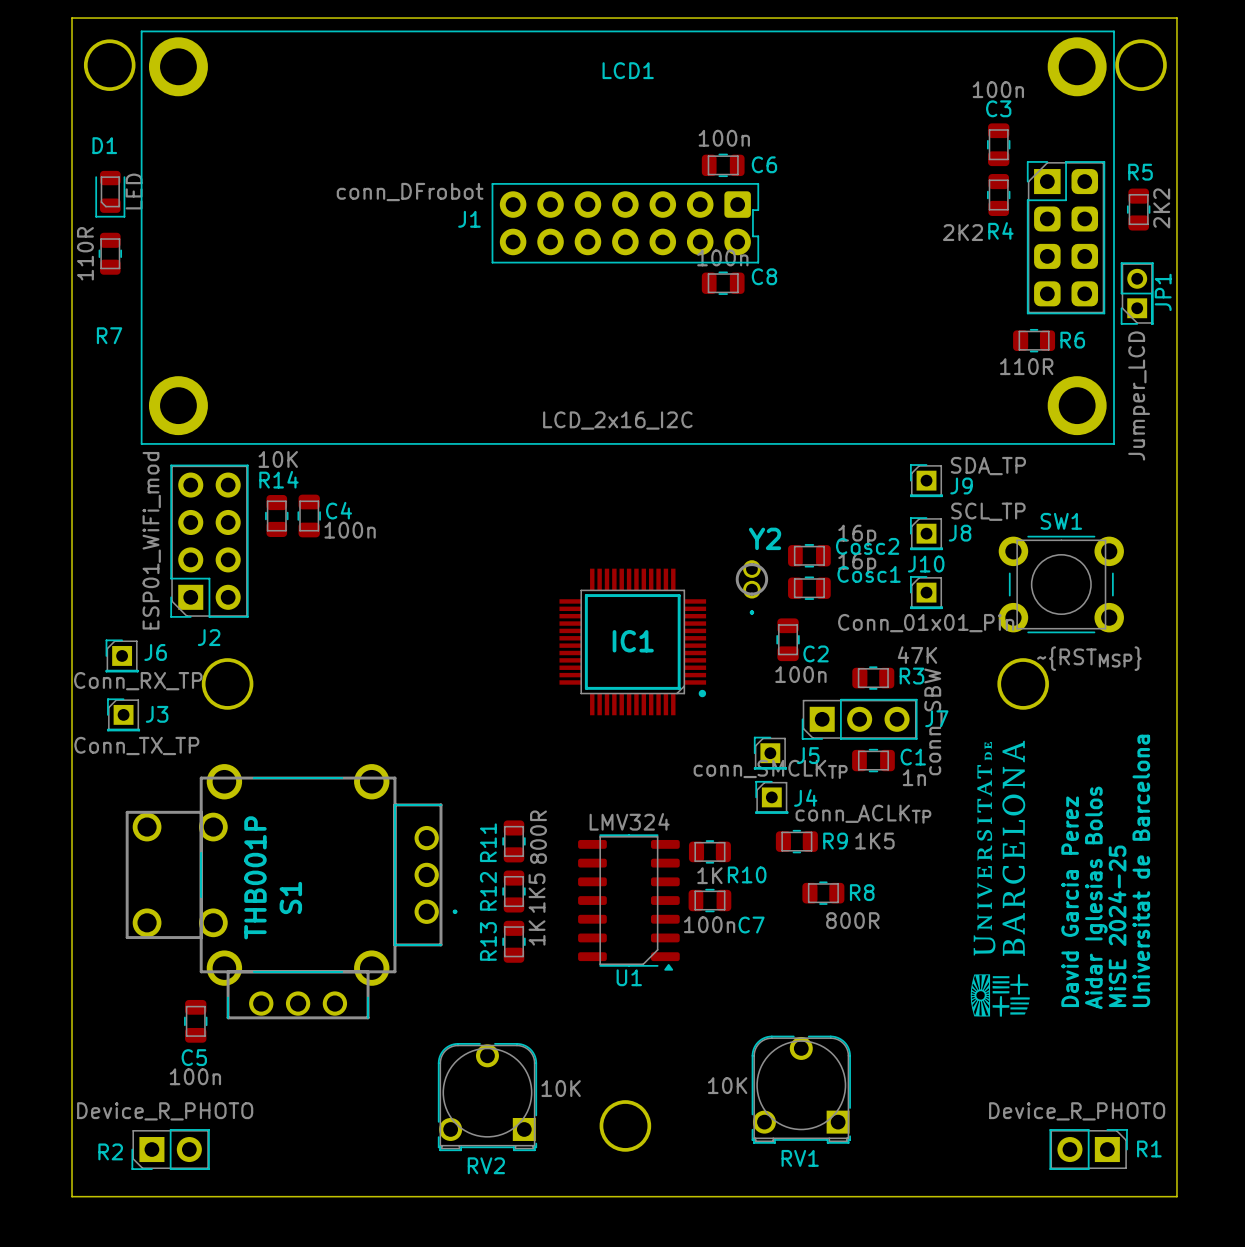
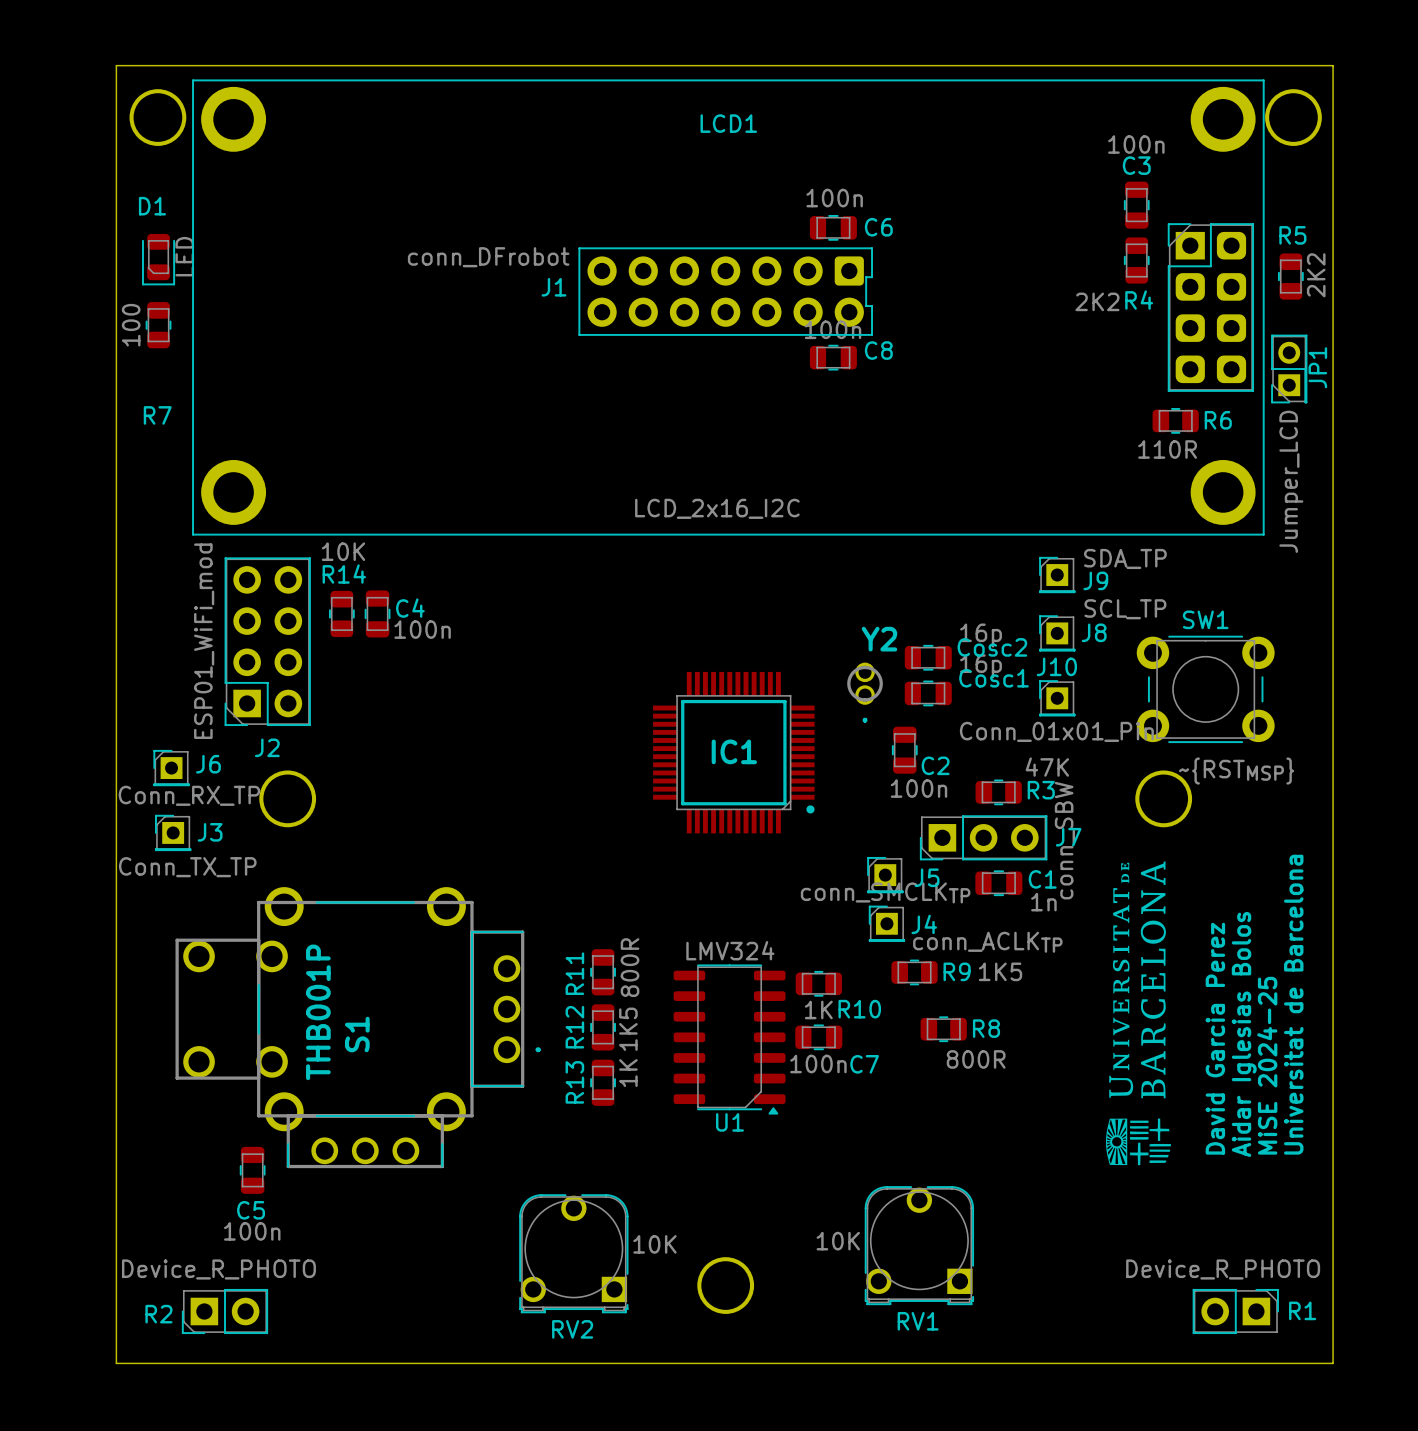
R7 value: 110R (85, 253) -> 100 (131, 325)

